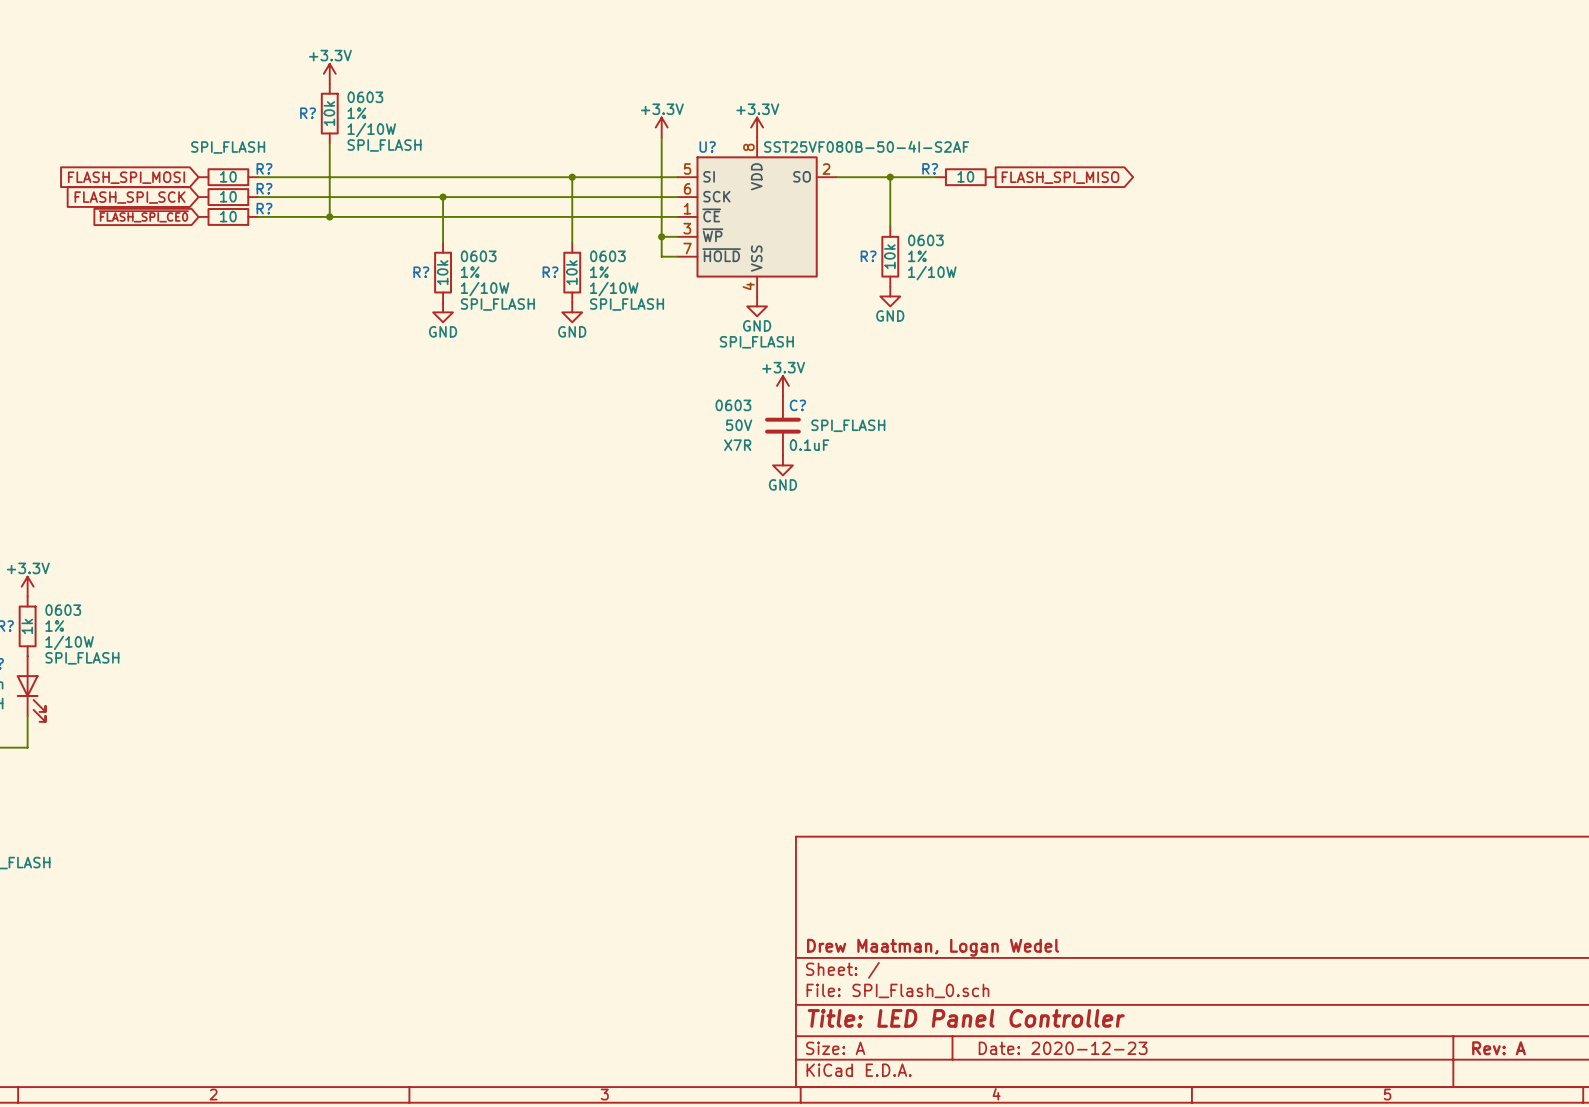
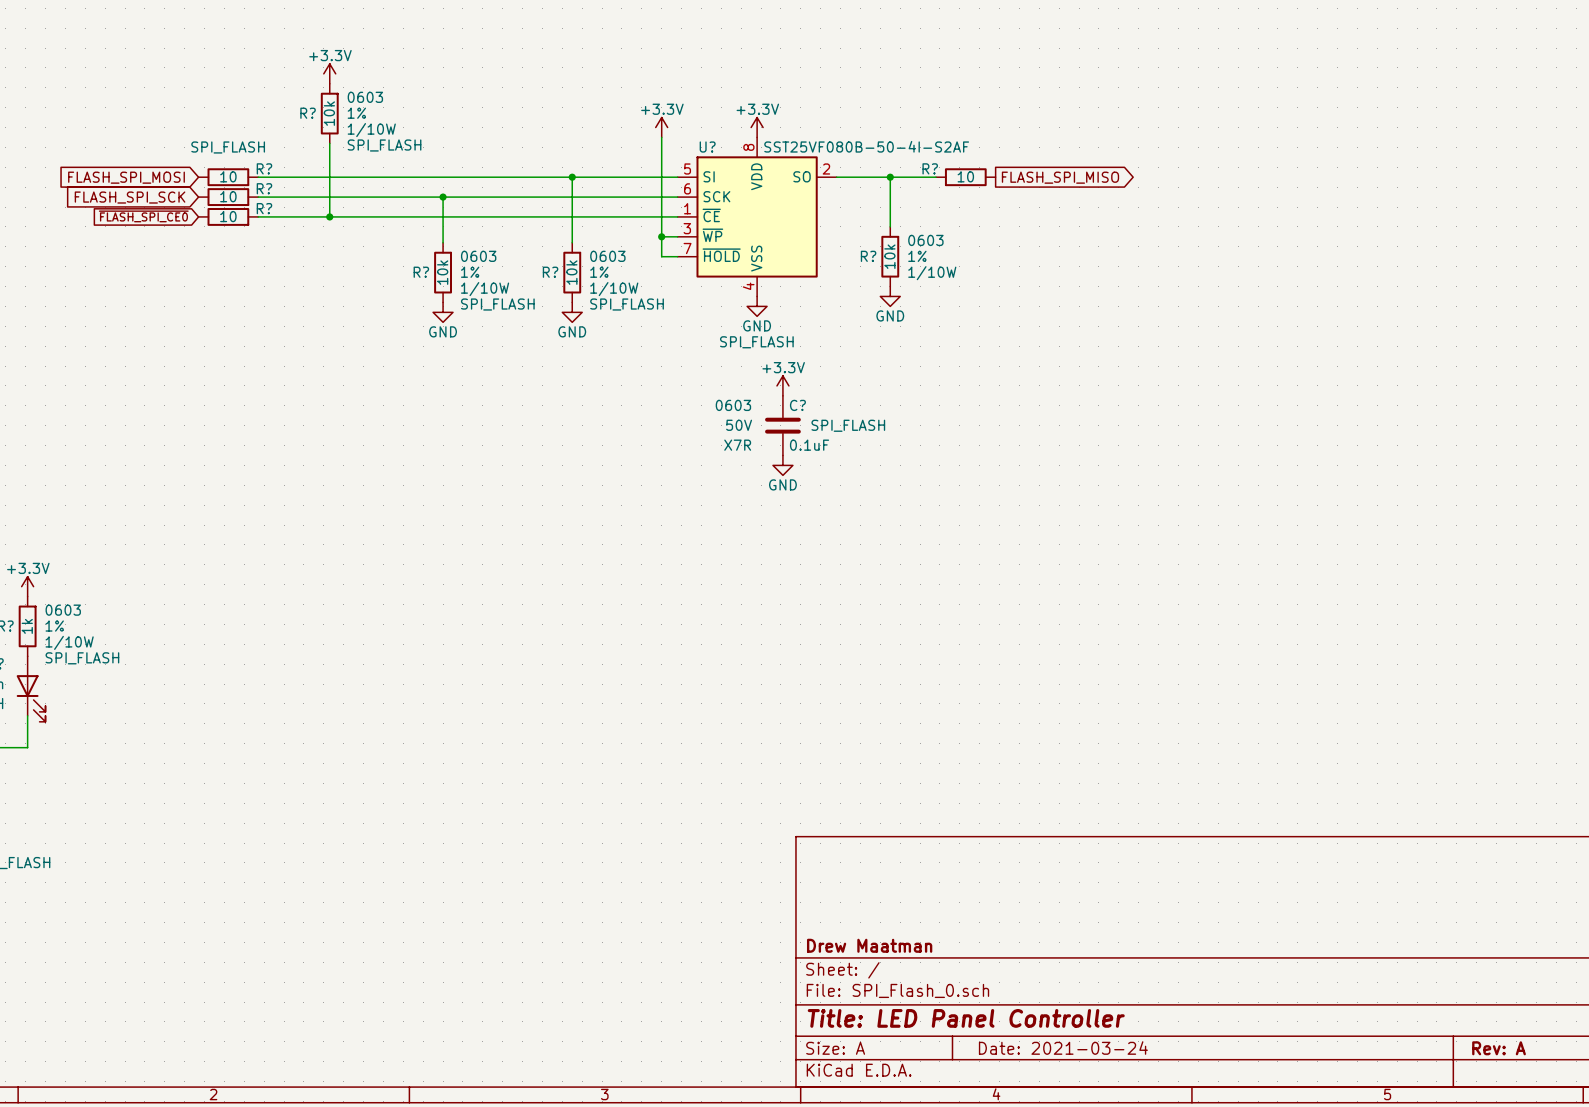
title block: Drew Maatman, Logan Wedel (933, 947) -> Drew Maatman (869, 945)
title block: Date: 2020-12-23 (1063, 1048) -> Date: 2021-03-24 (1063, 1048)

